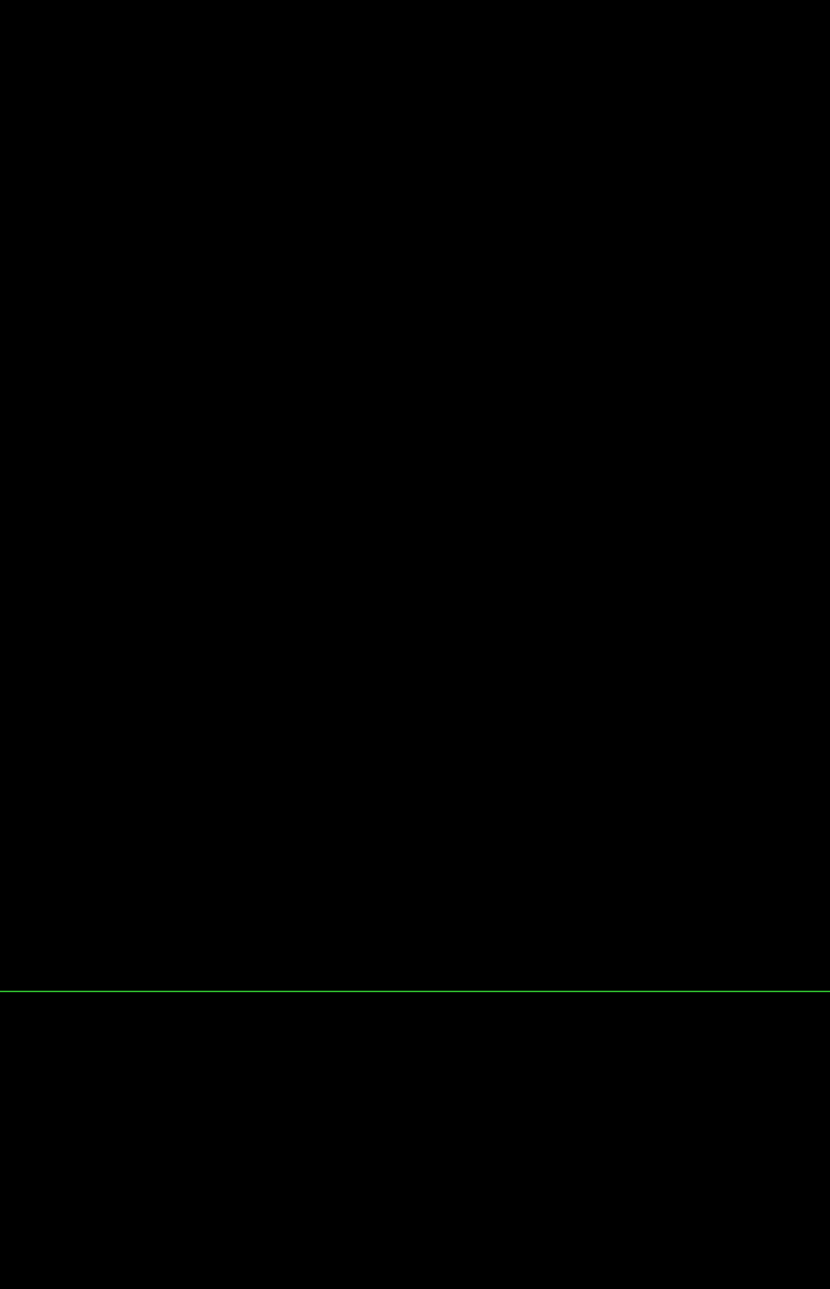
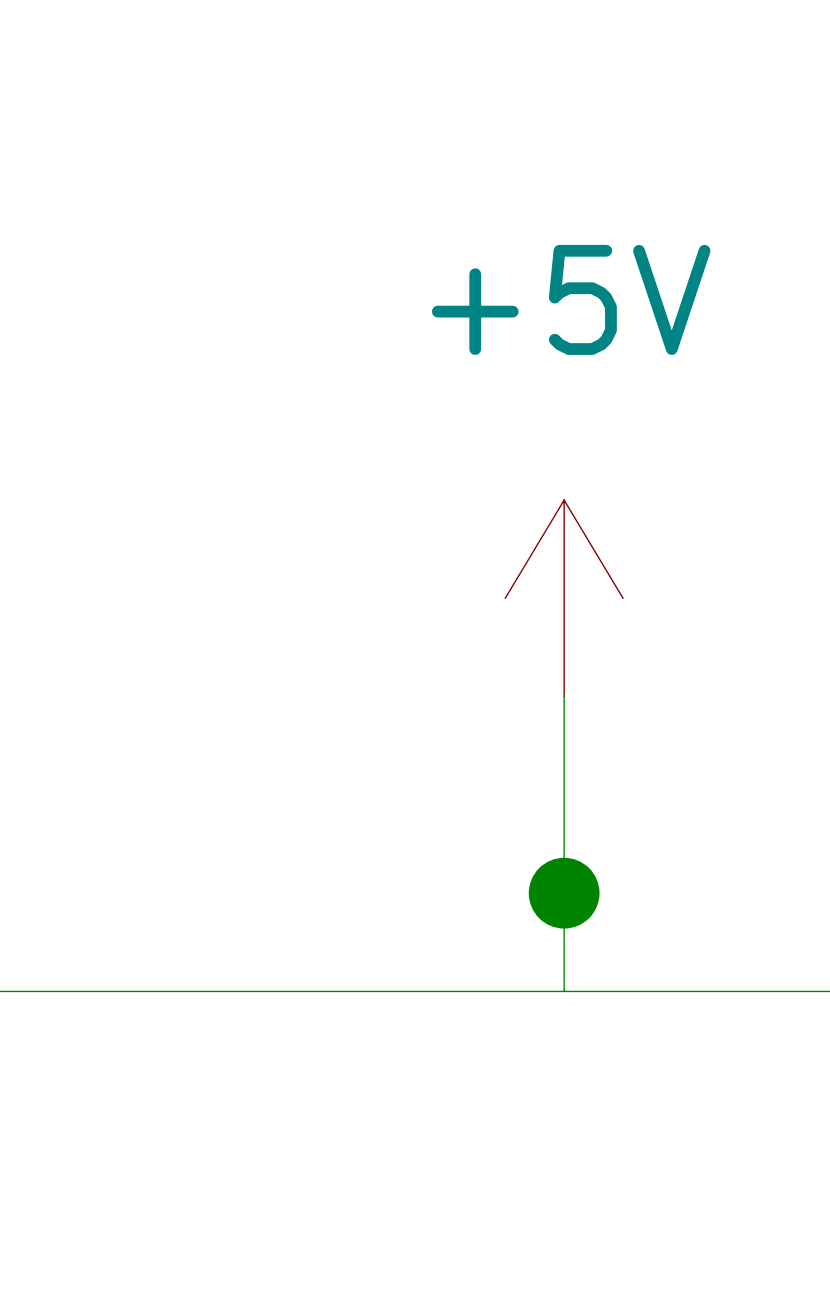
power symbol: none -> +5V (564, 598)
wire: none -> (564, 696) (564, 991)
junction: none -> (564, 893)

